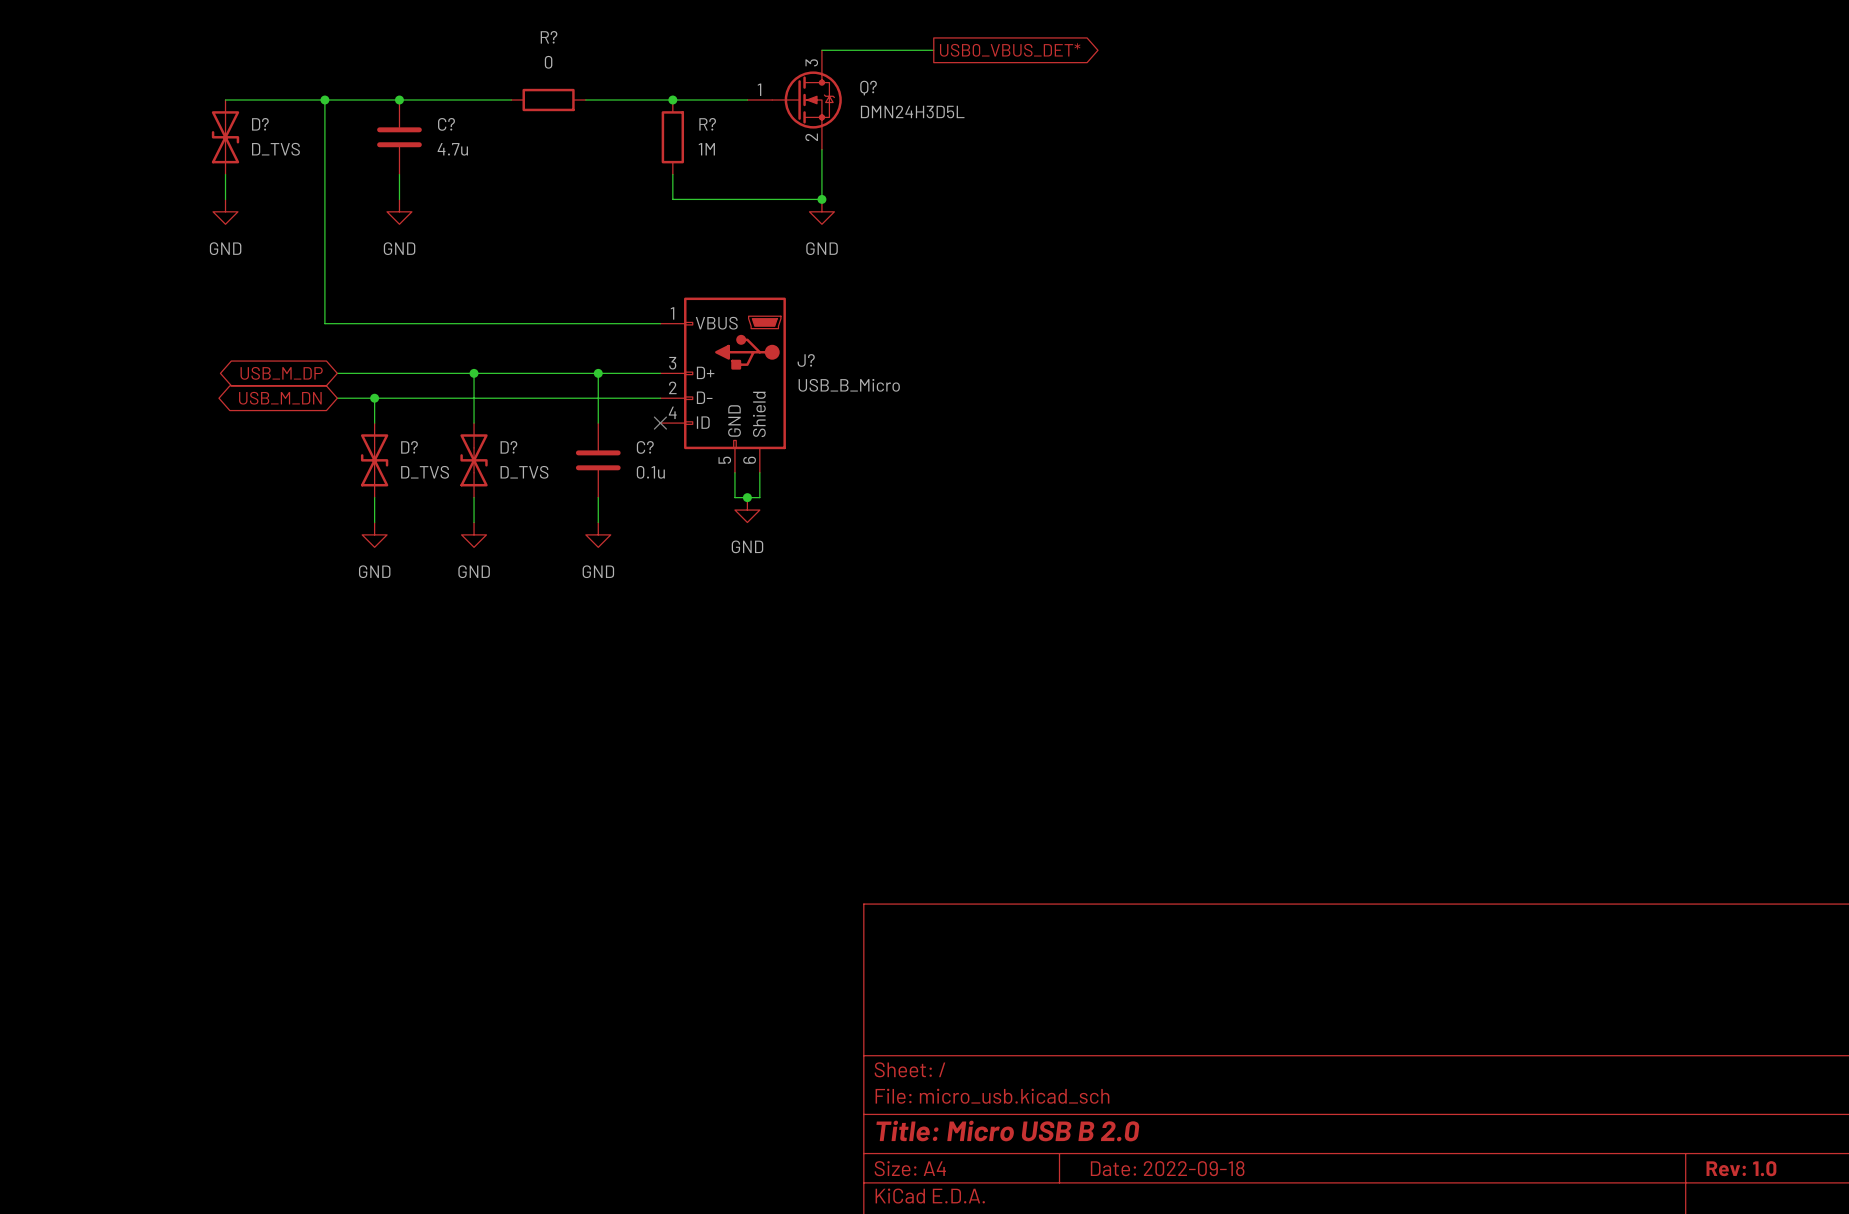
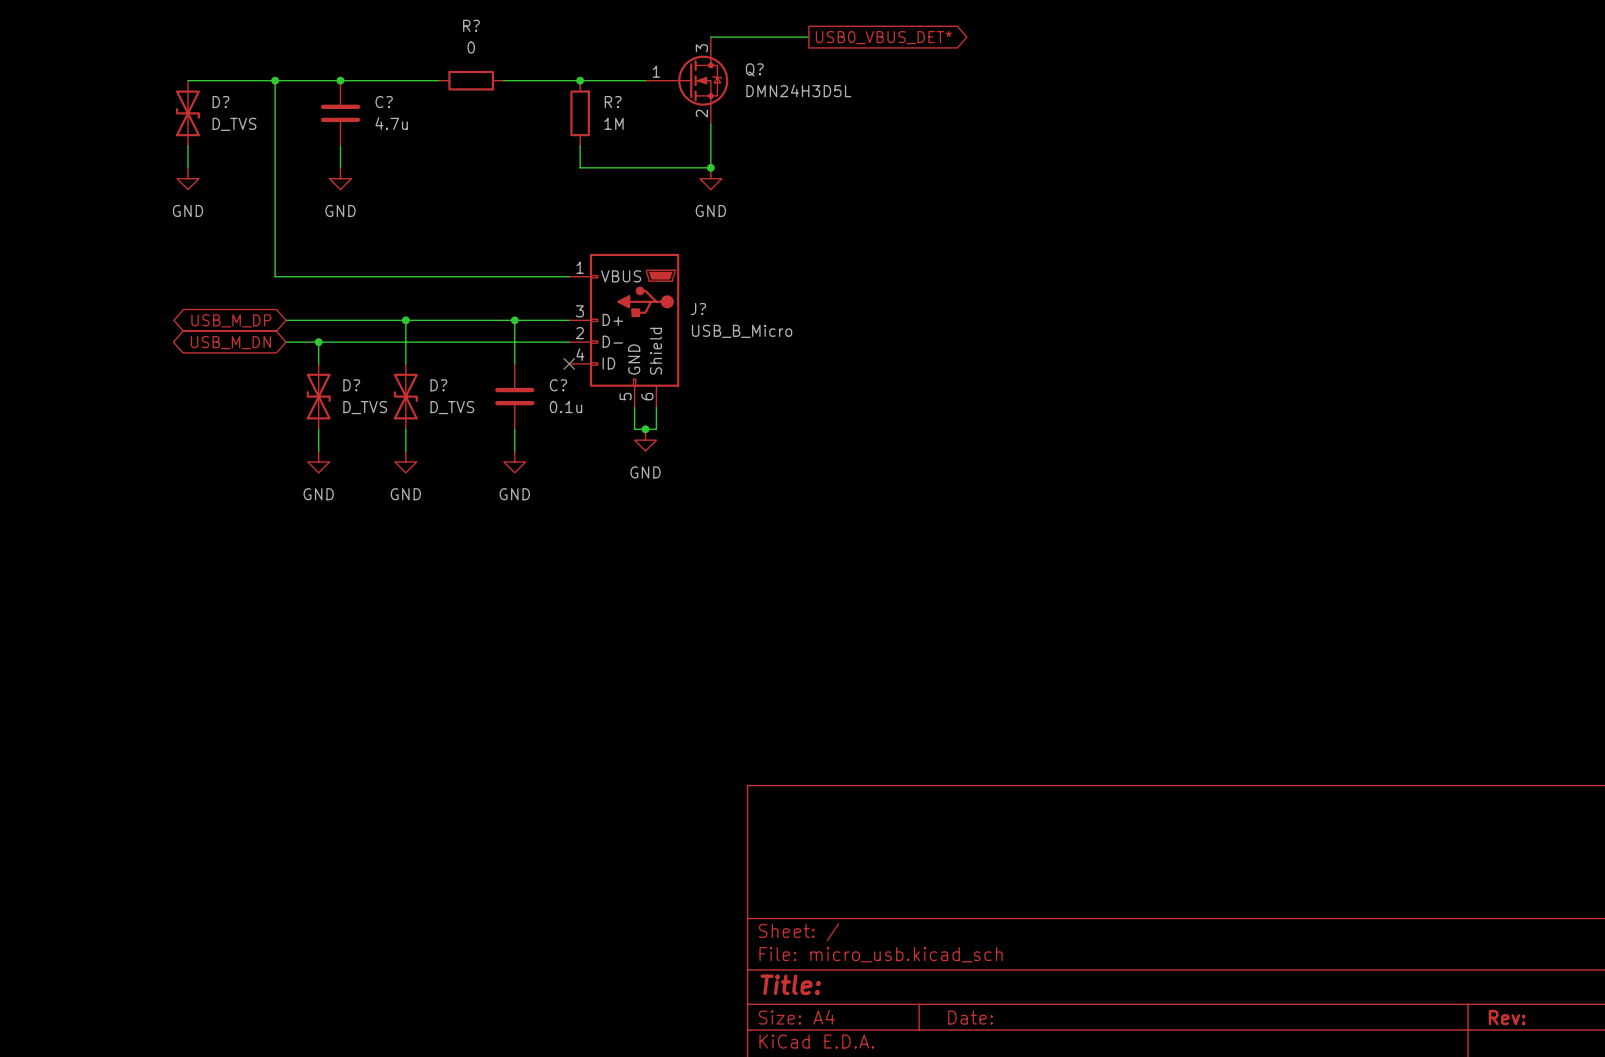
title block: Title: Micro USB B 2.0 (1007, 1131) -> Title: (790, 984)
title block: Date: 2022-09-18 (1167, 1168) -> Date: (970, 1017)
title block: Rev: 1.0 (1741, 1168) -> Rev: (1507, 1017)

